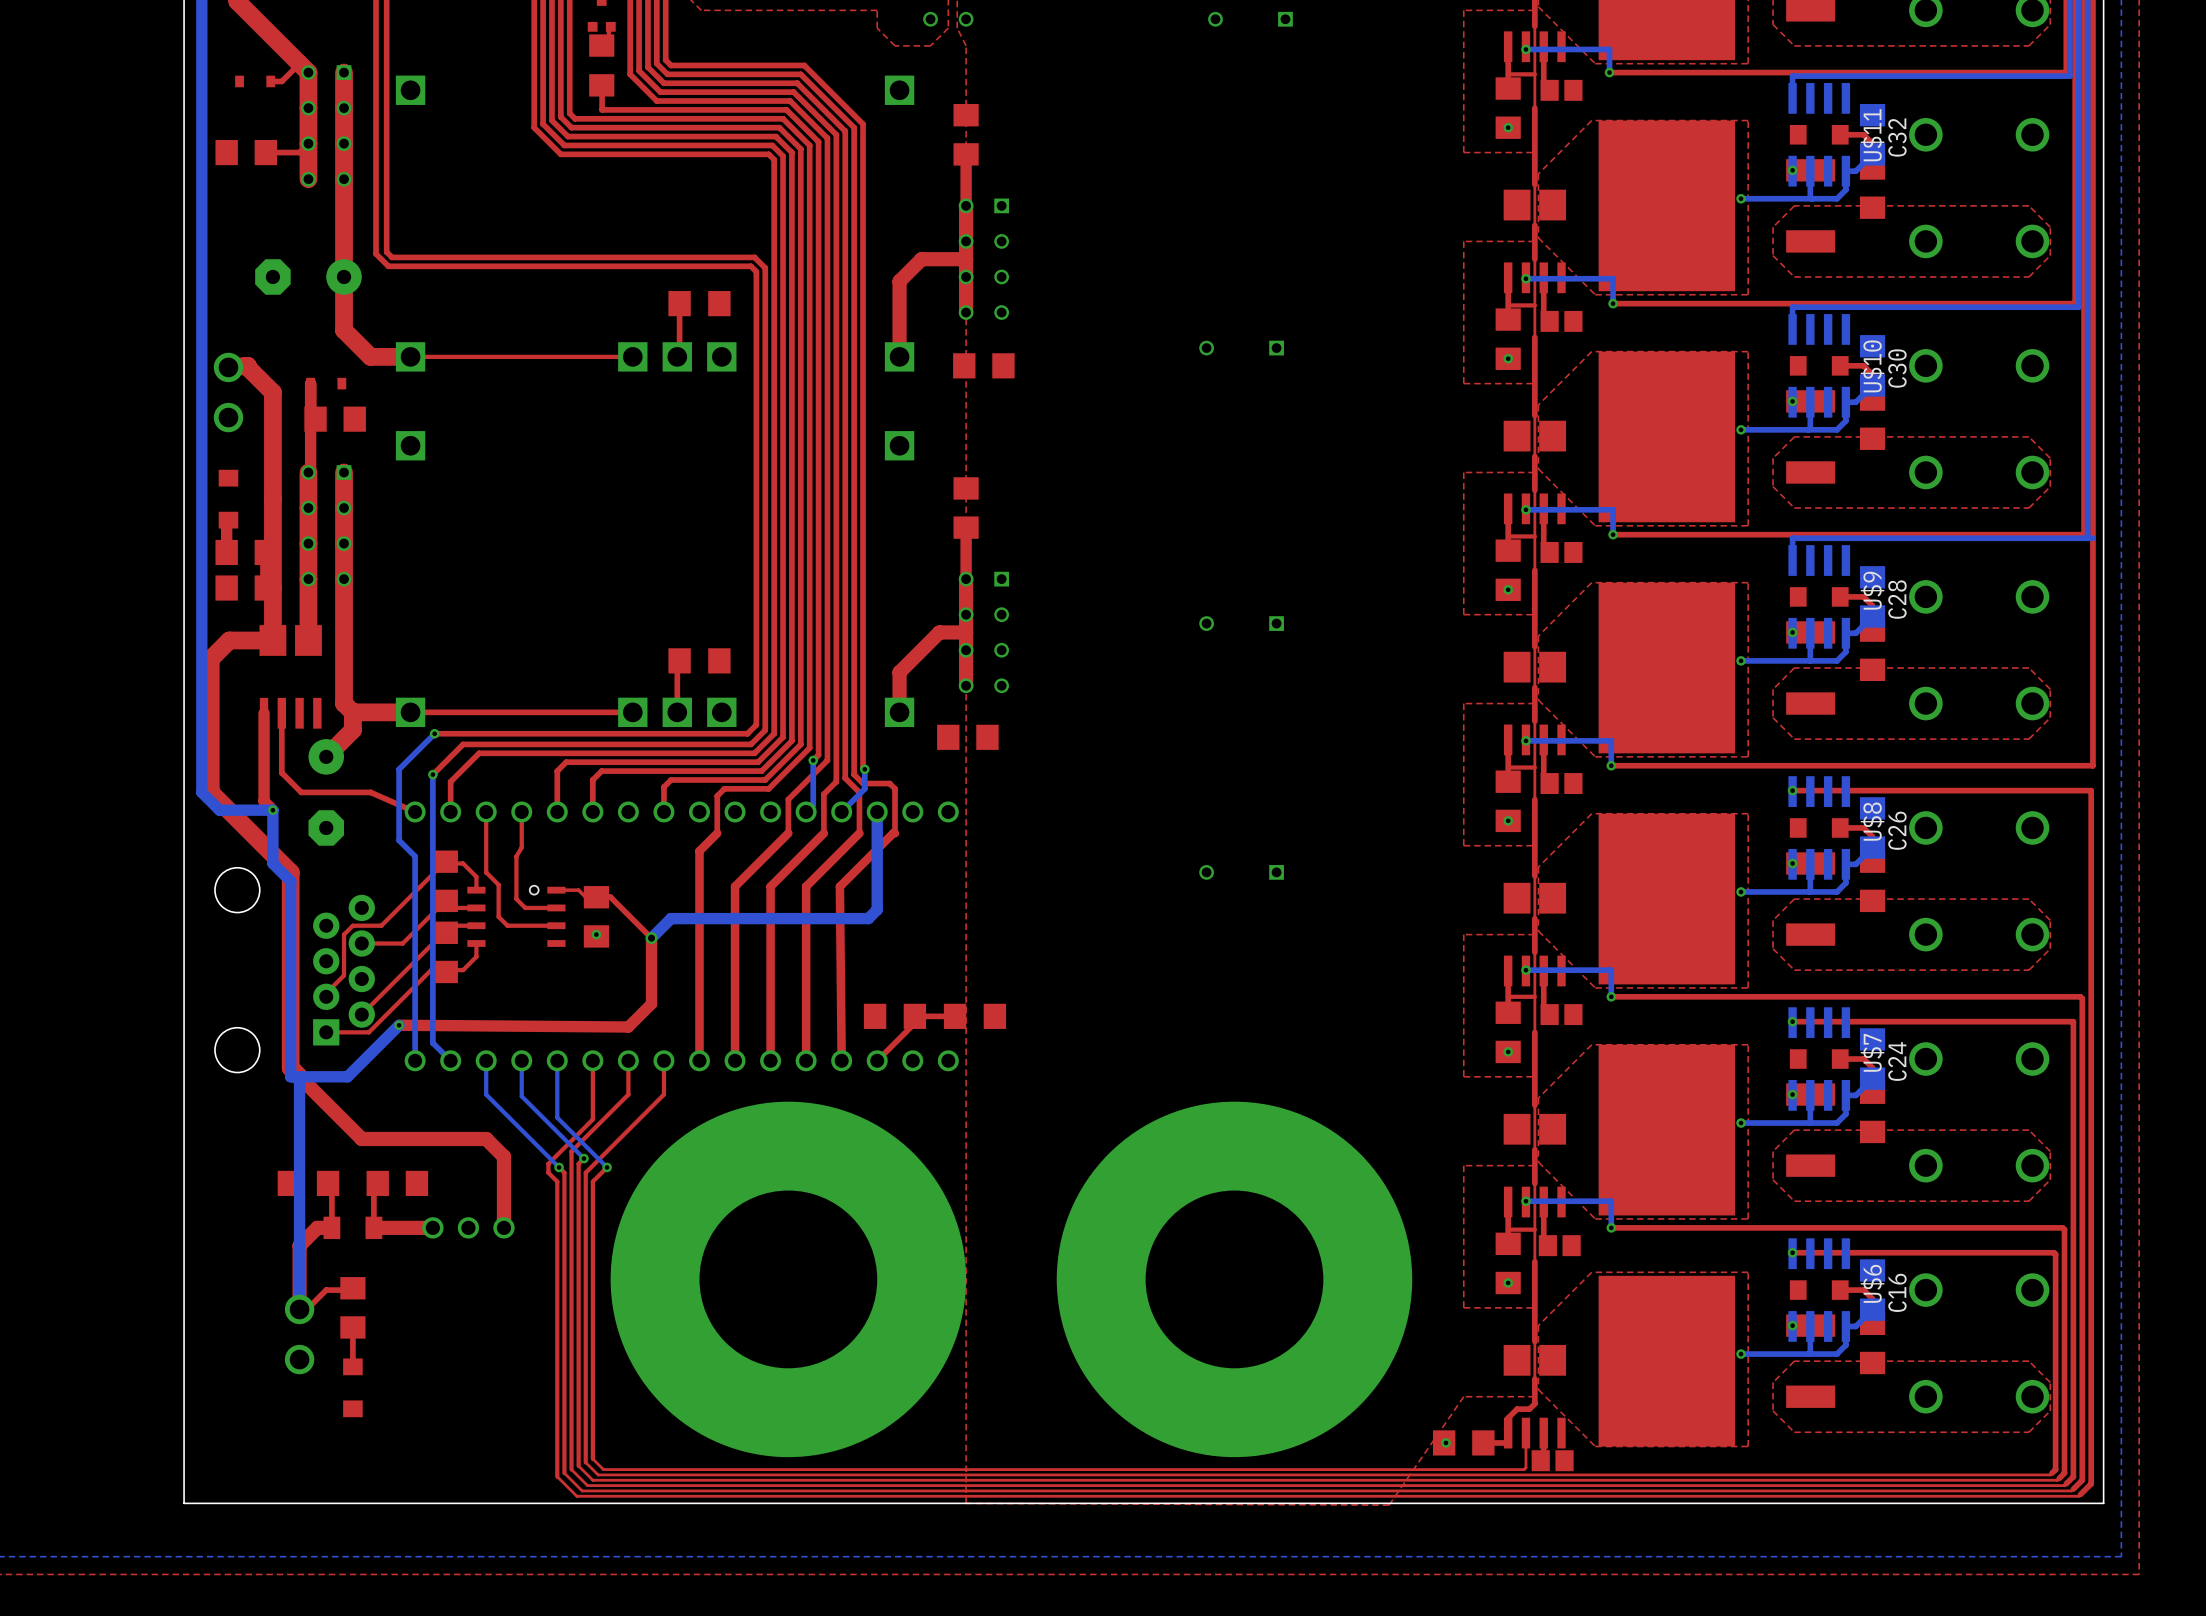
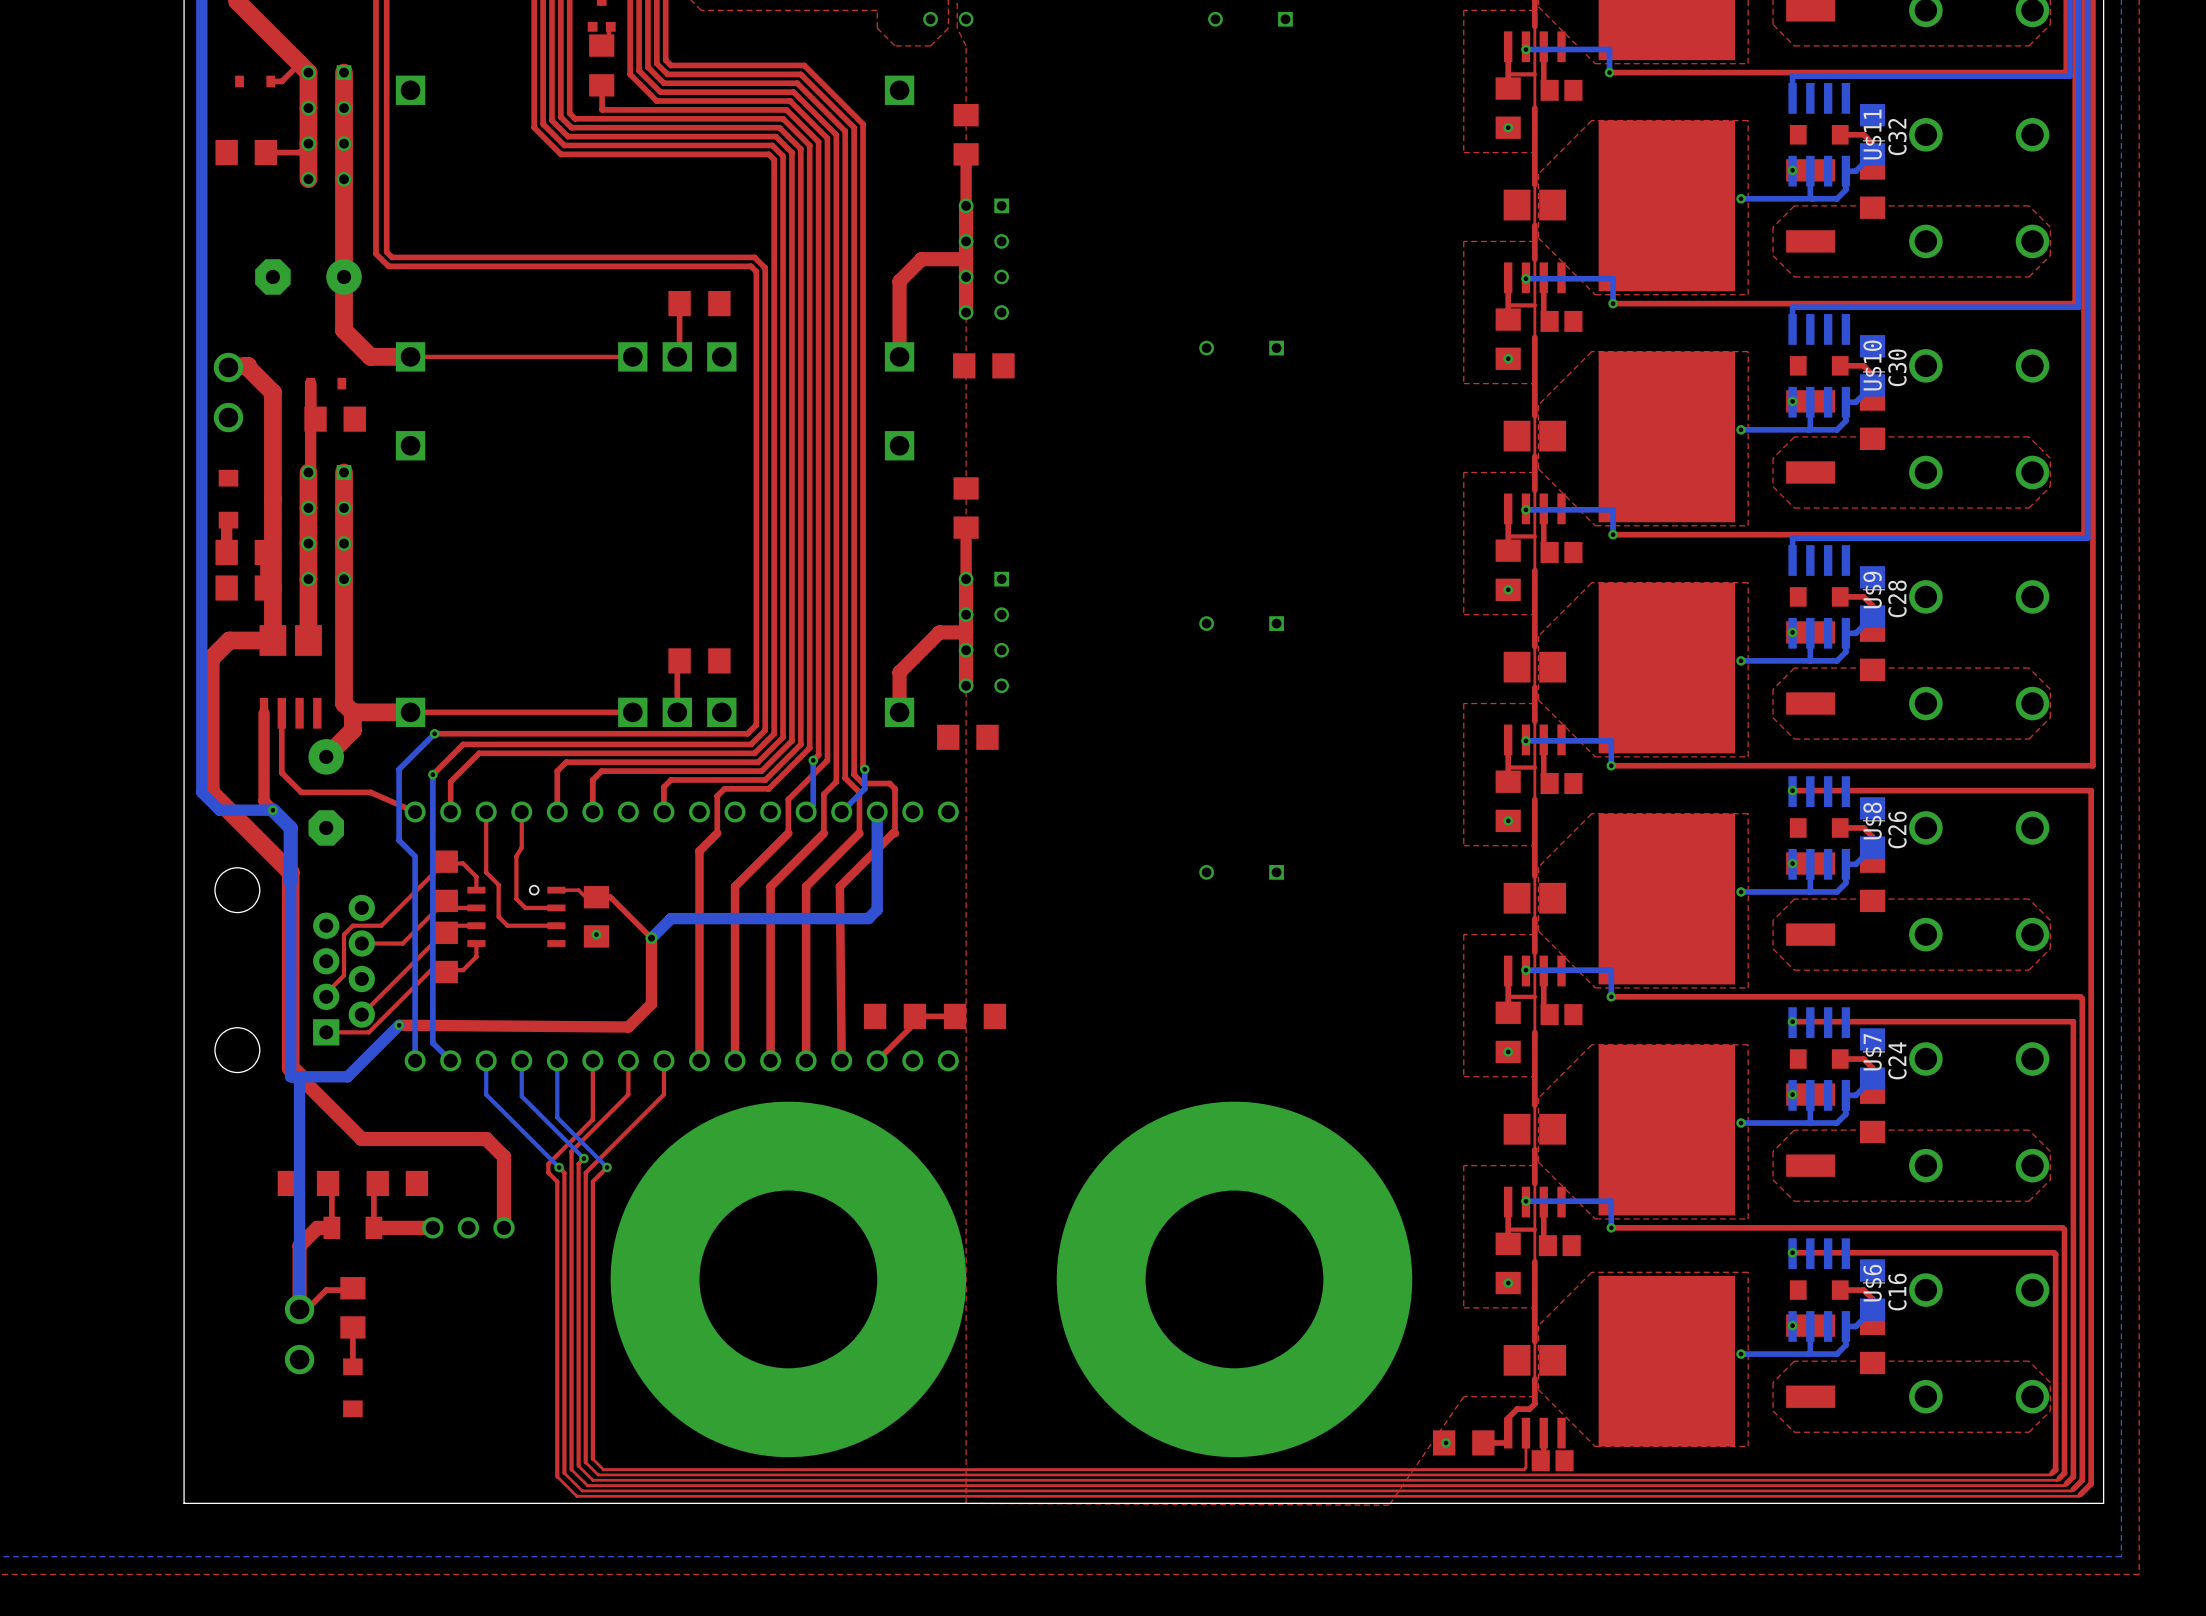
bottom track: (2092, 538) (2087, 538) -> none
bottom track: (272, 810) (272, 863) (290, 881) -> (272, 810) (290, 827) (290, 881)

